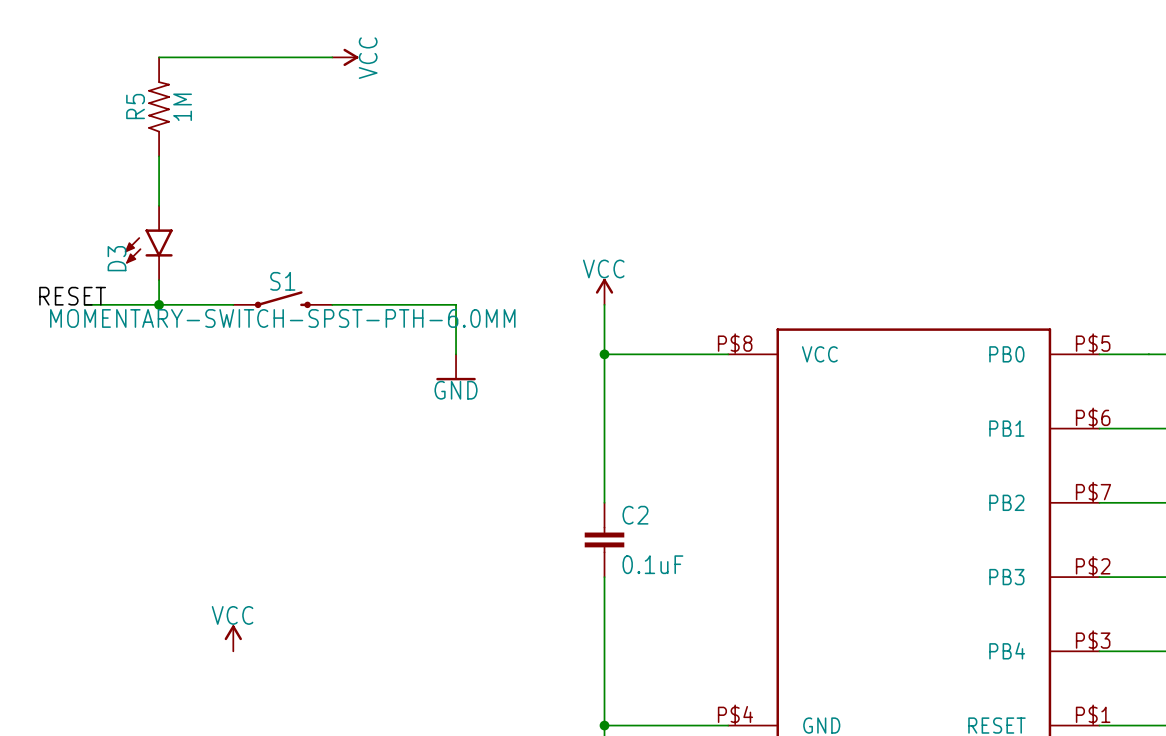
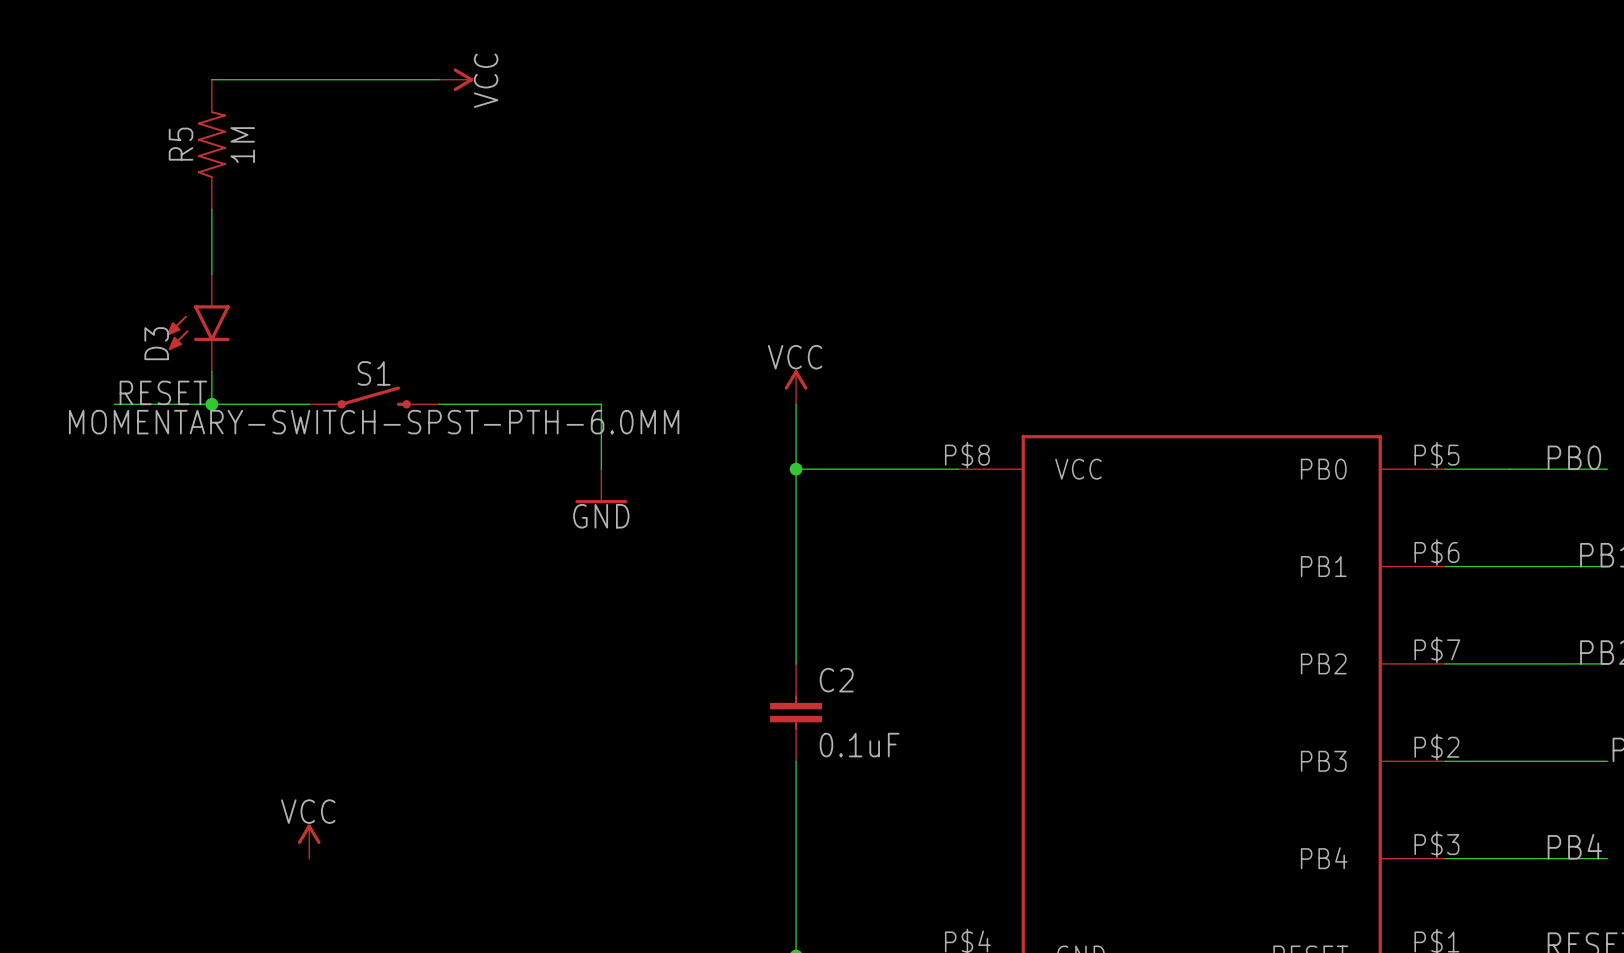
label position: RESET (72, 296) -> RESET (163, 392)

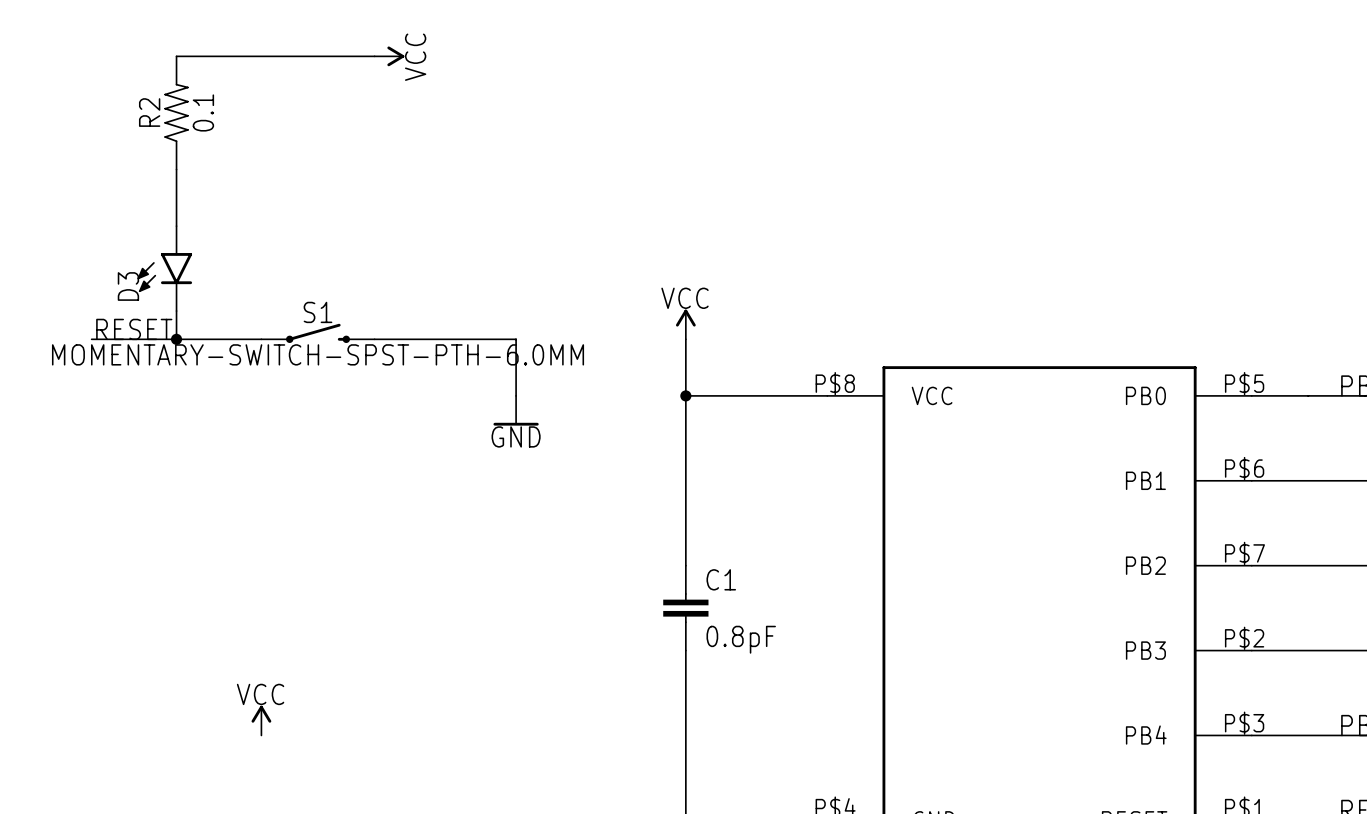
R5 name: R5 (181, 144) -> R2 (149, 112)
R5 value: 1M (242, 145) -> 0.1 (203, 112)
C2 name: C2 (836, 680) -> C1 (721, 579)
C2 value: 0.1uF (859, 745) -> 0.8pF (741, 639)

